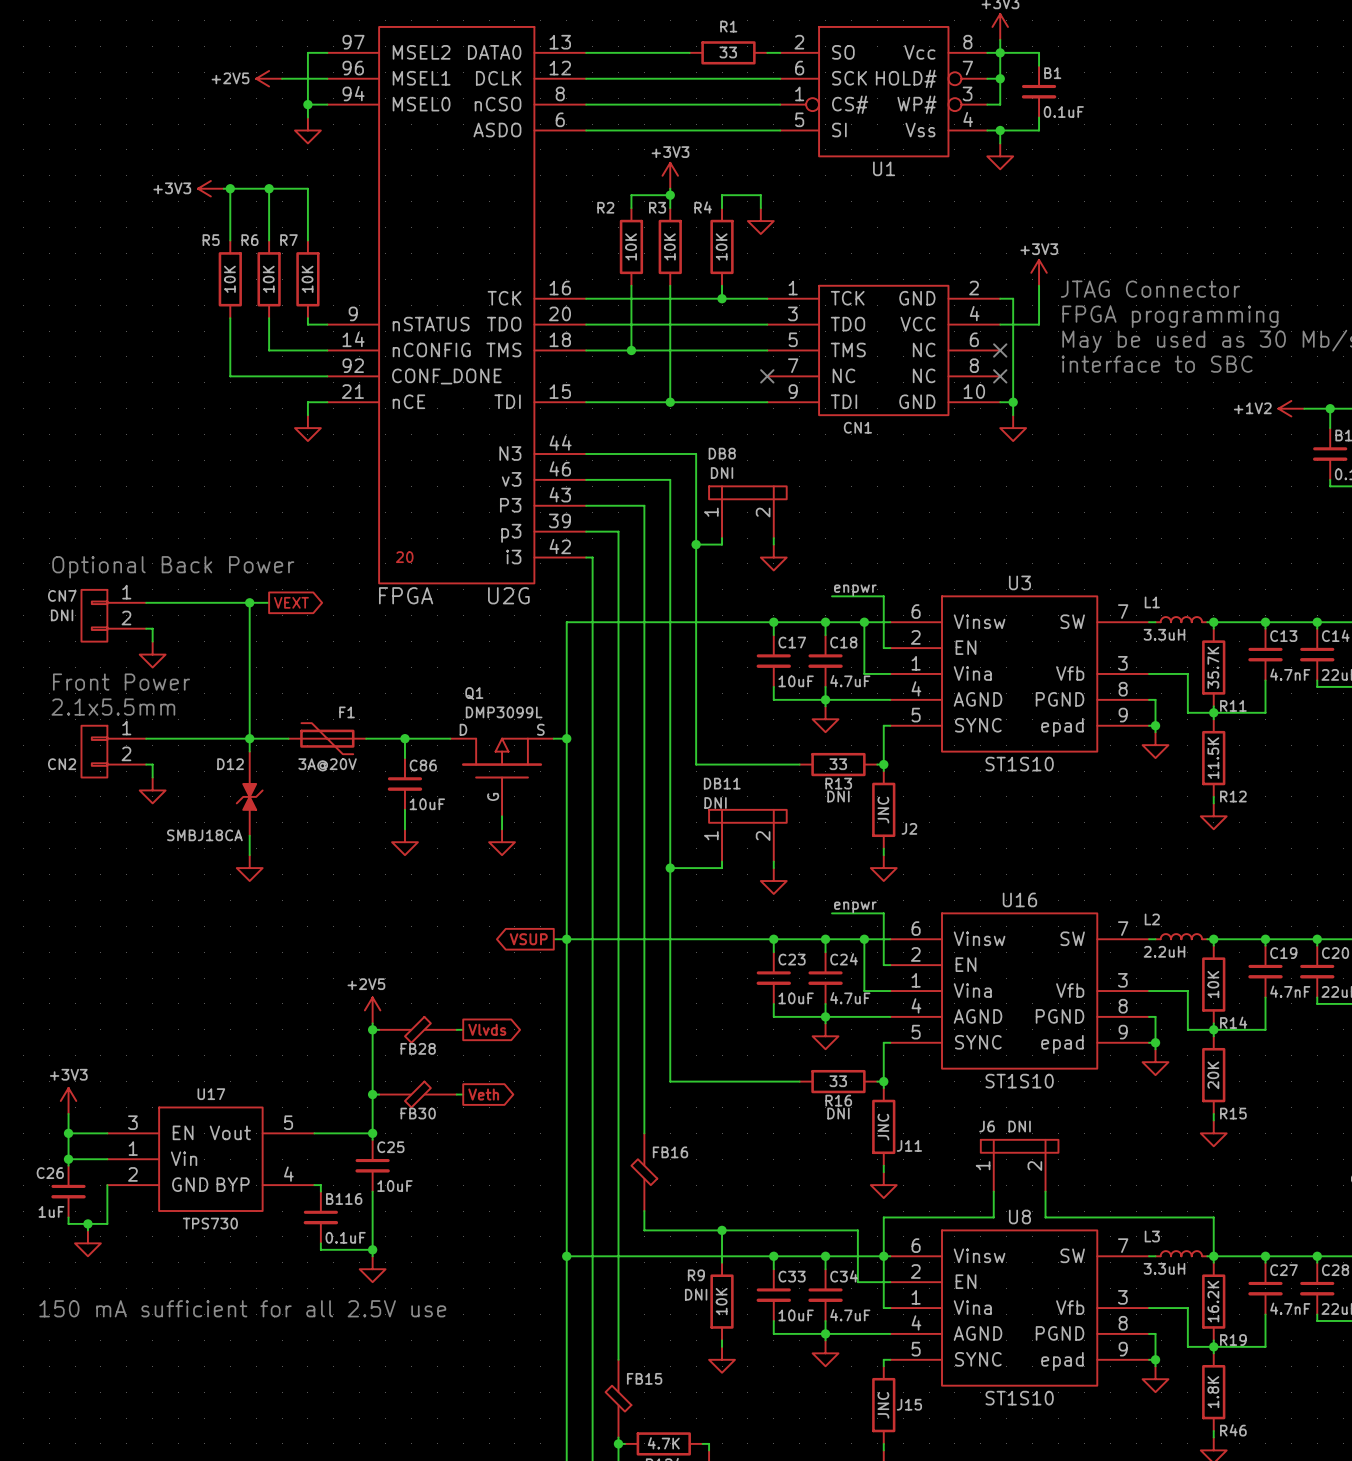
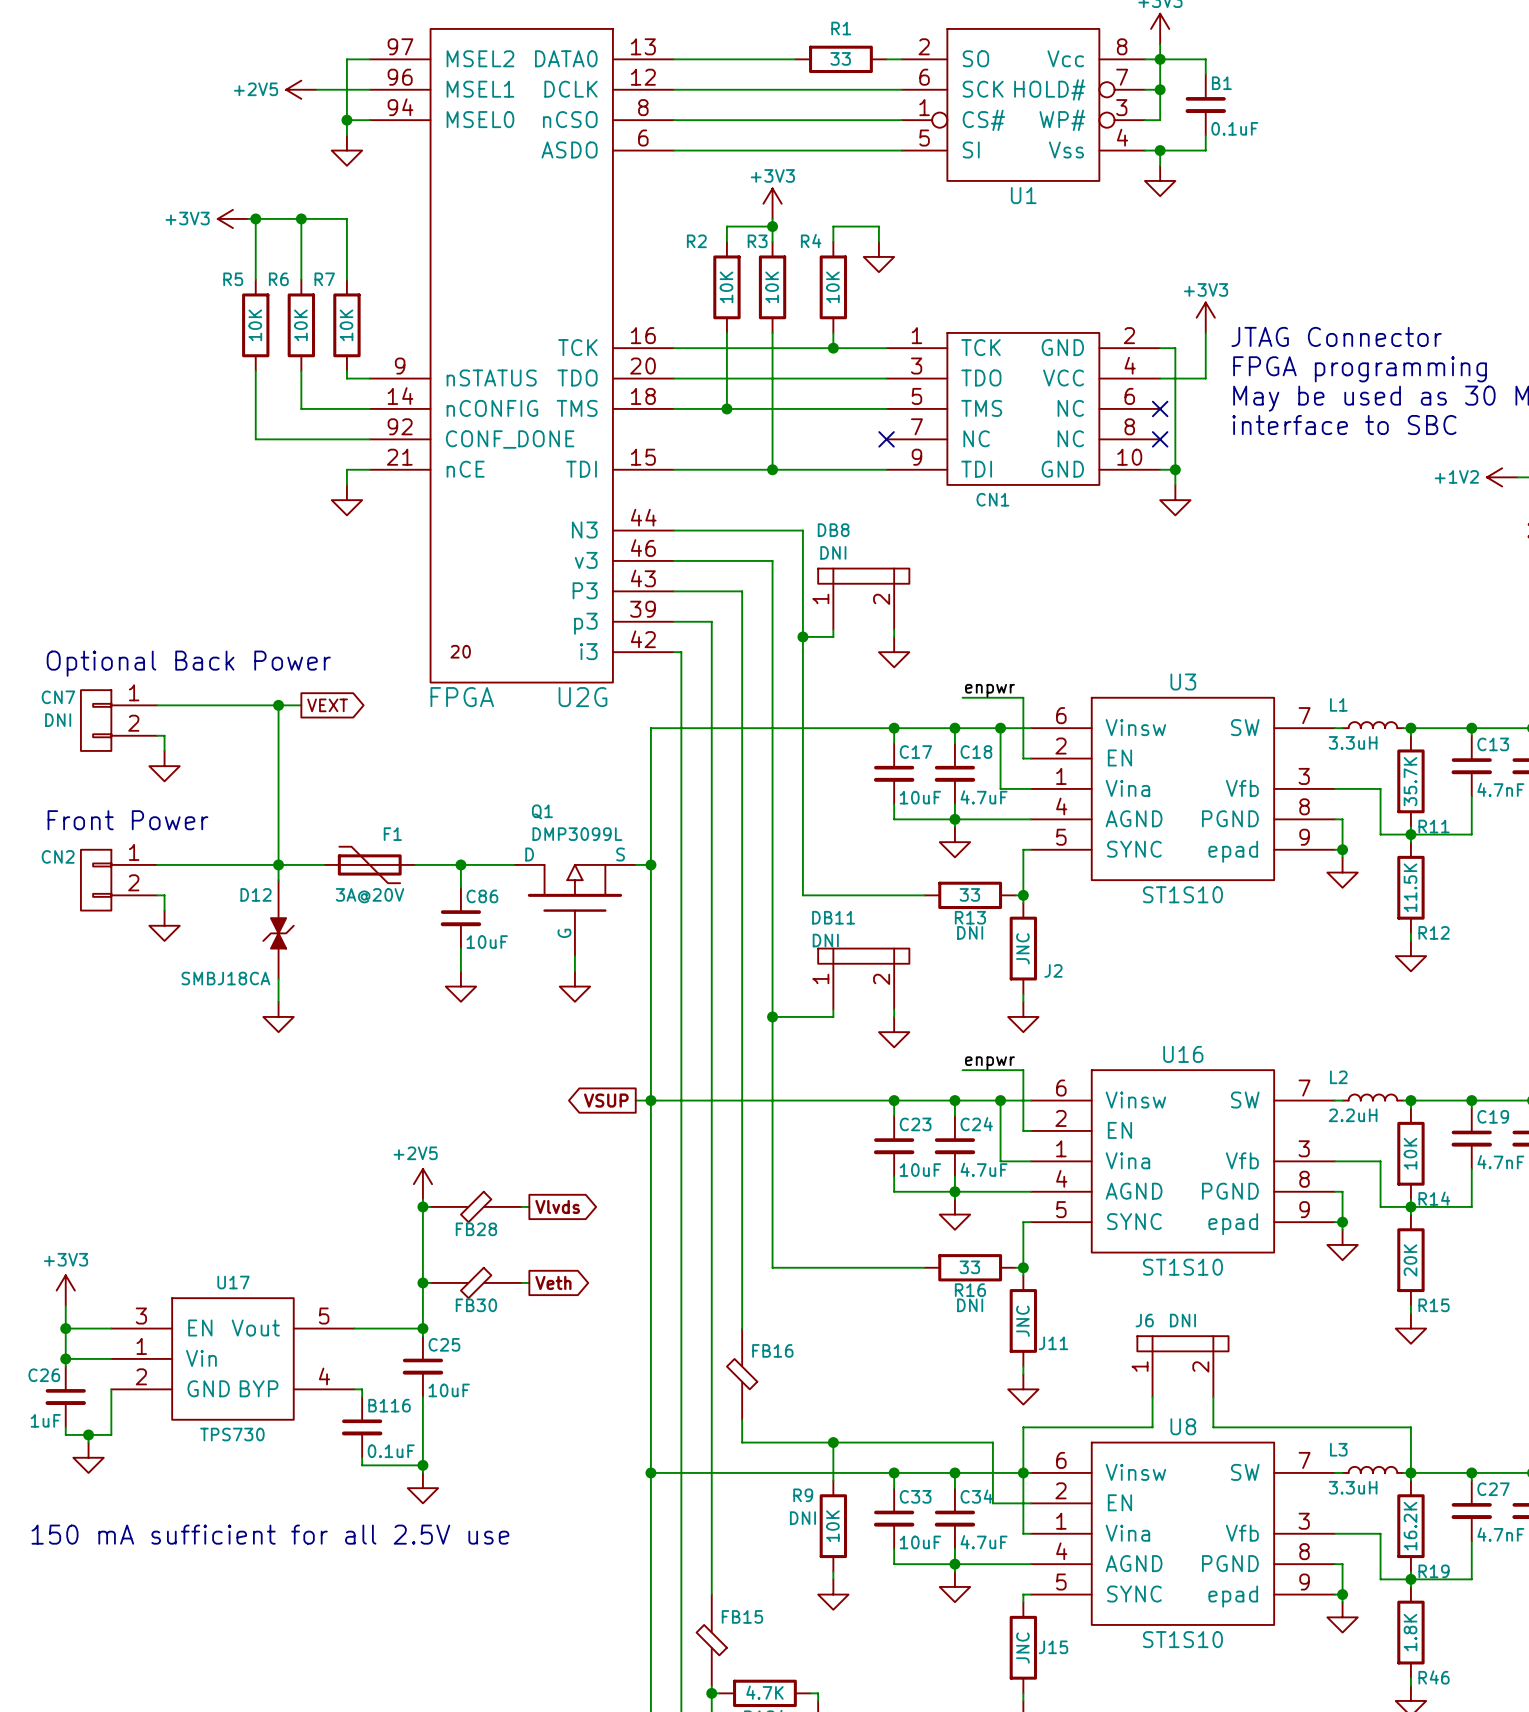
text position: Front Power (121, 682) -> Front Power (127, 820)
text: 2.1x5.5mm (113, 707) -> none
CN2 name position: CN2 (62, 764) -> CN2 (58, 856)

